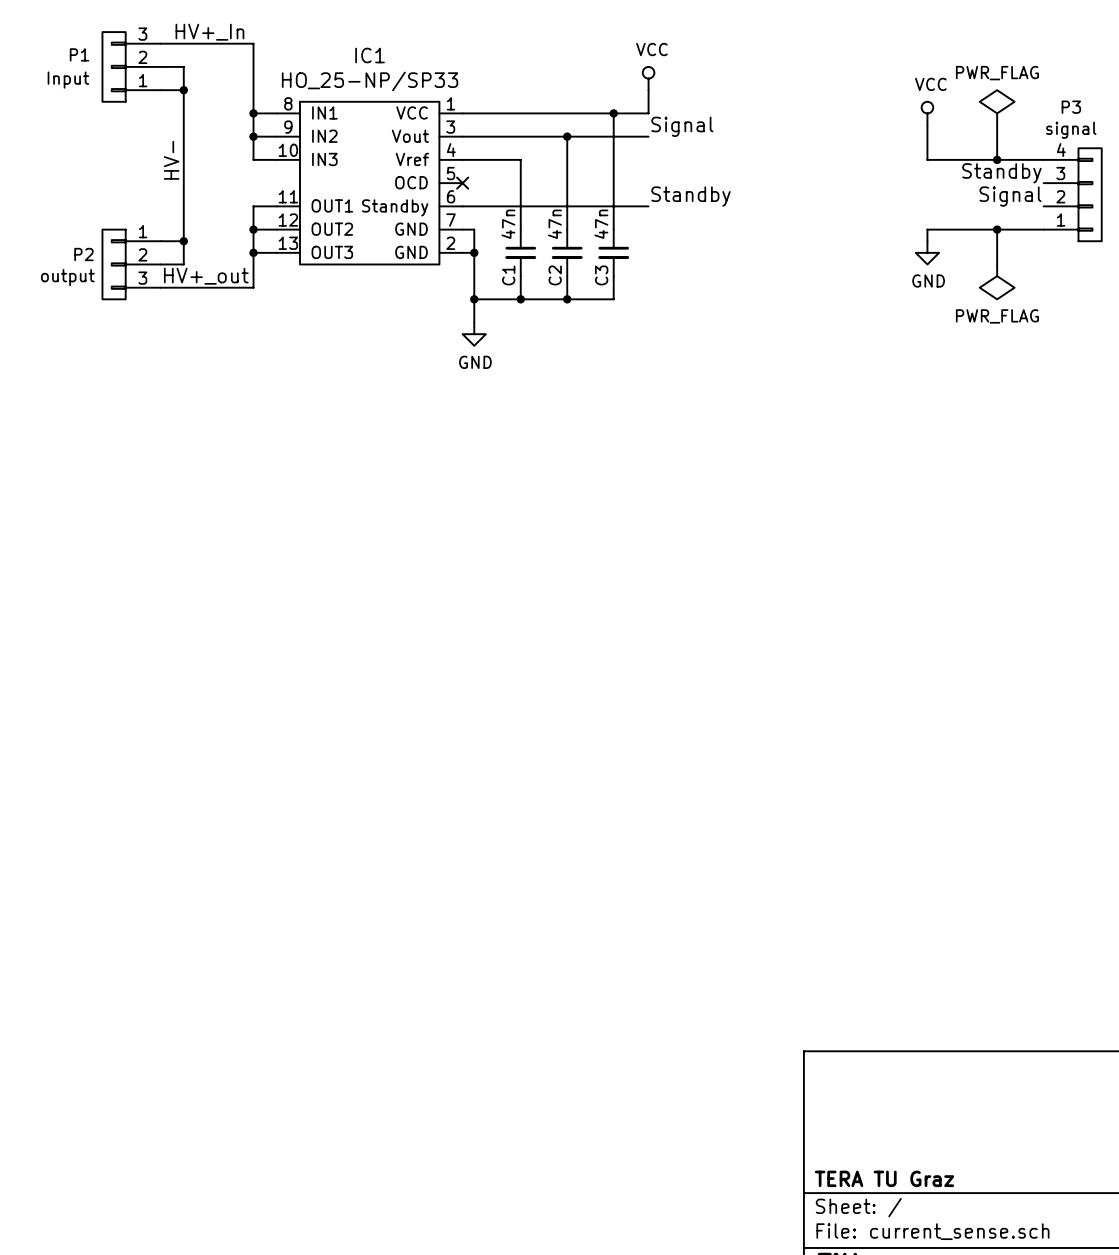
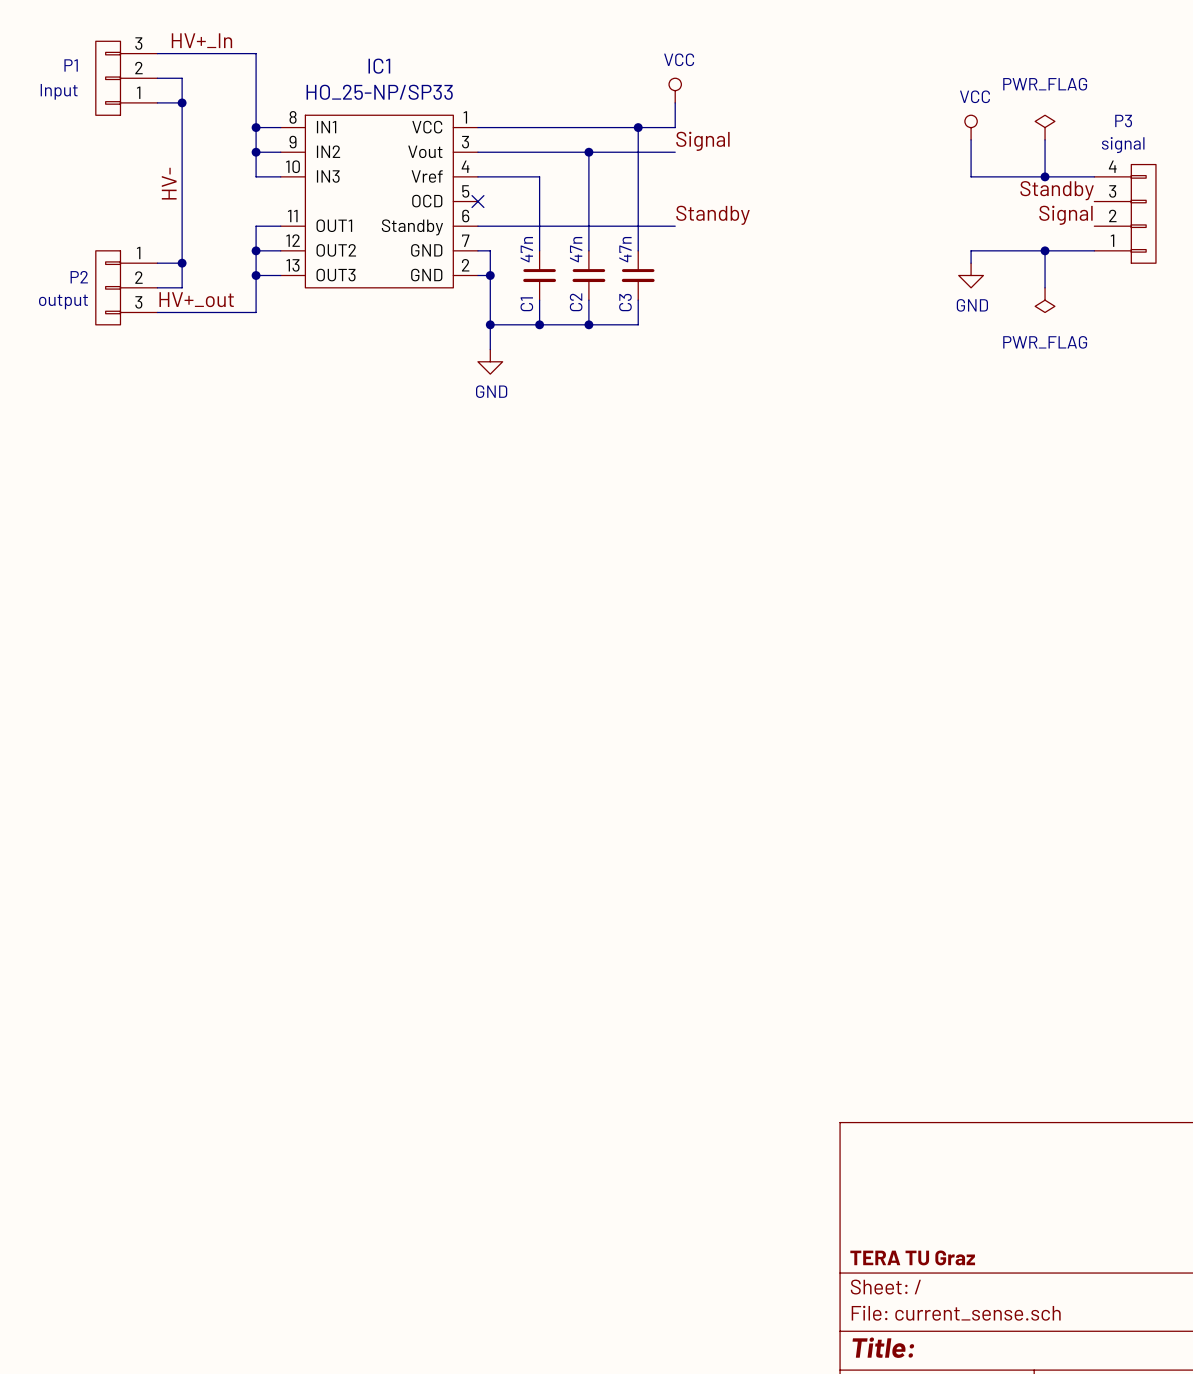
power symbol shape: [979, 90, 1015, 126] -> [1035, 115, 1055, 140]
power symbol shape: [979, 264, 1015, 300] -> [1035, 287, 1055, 313]

